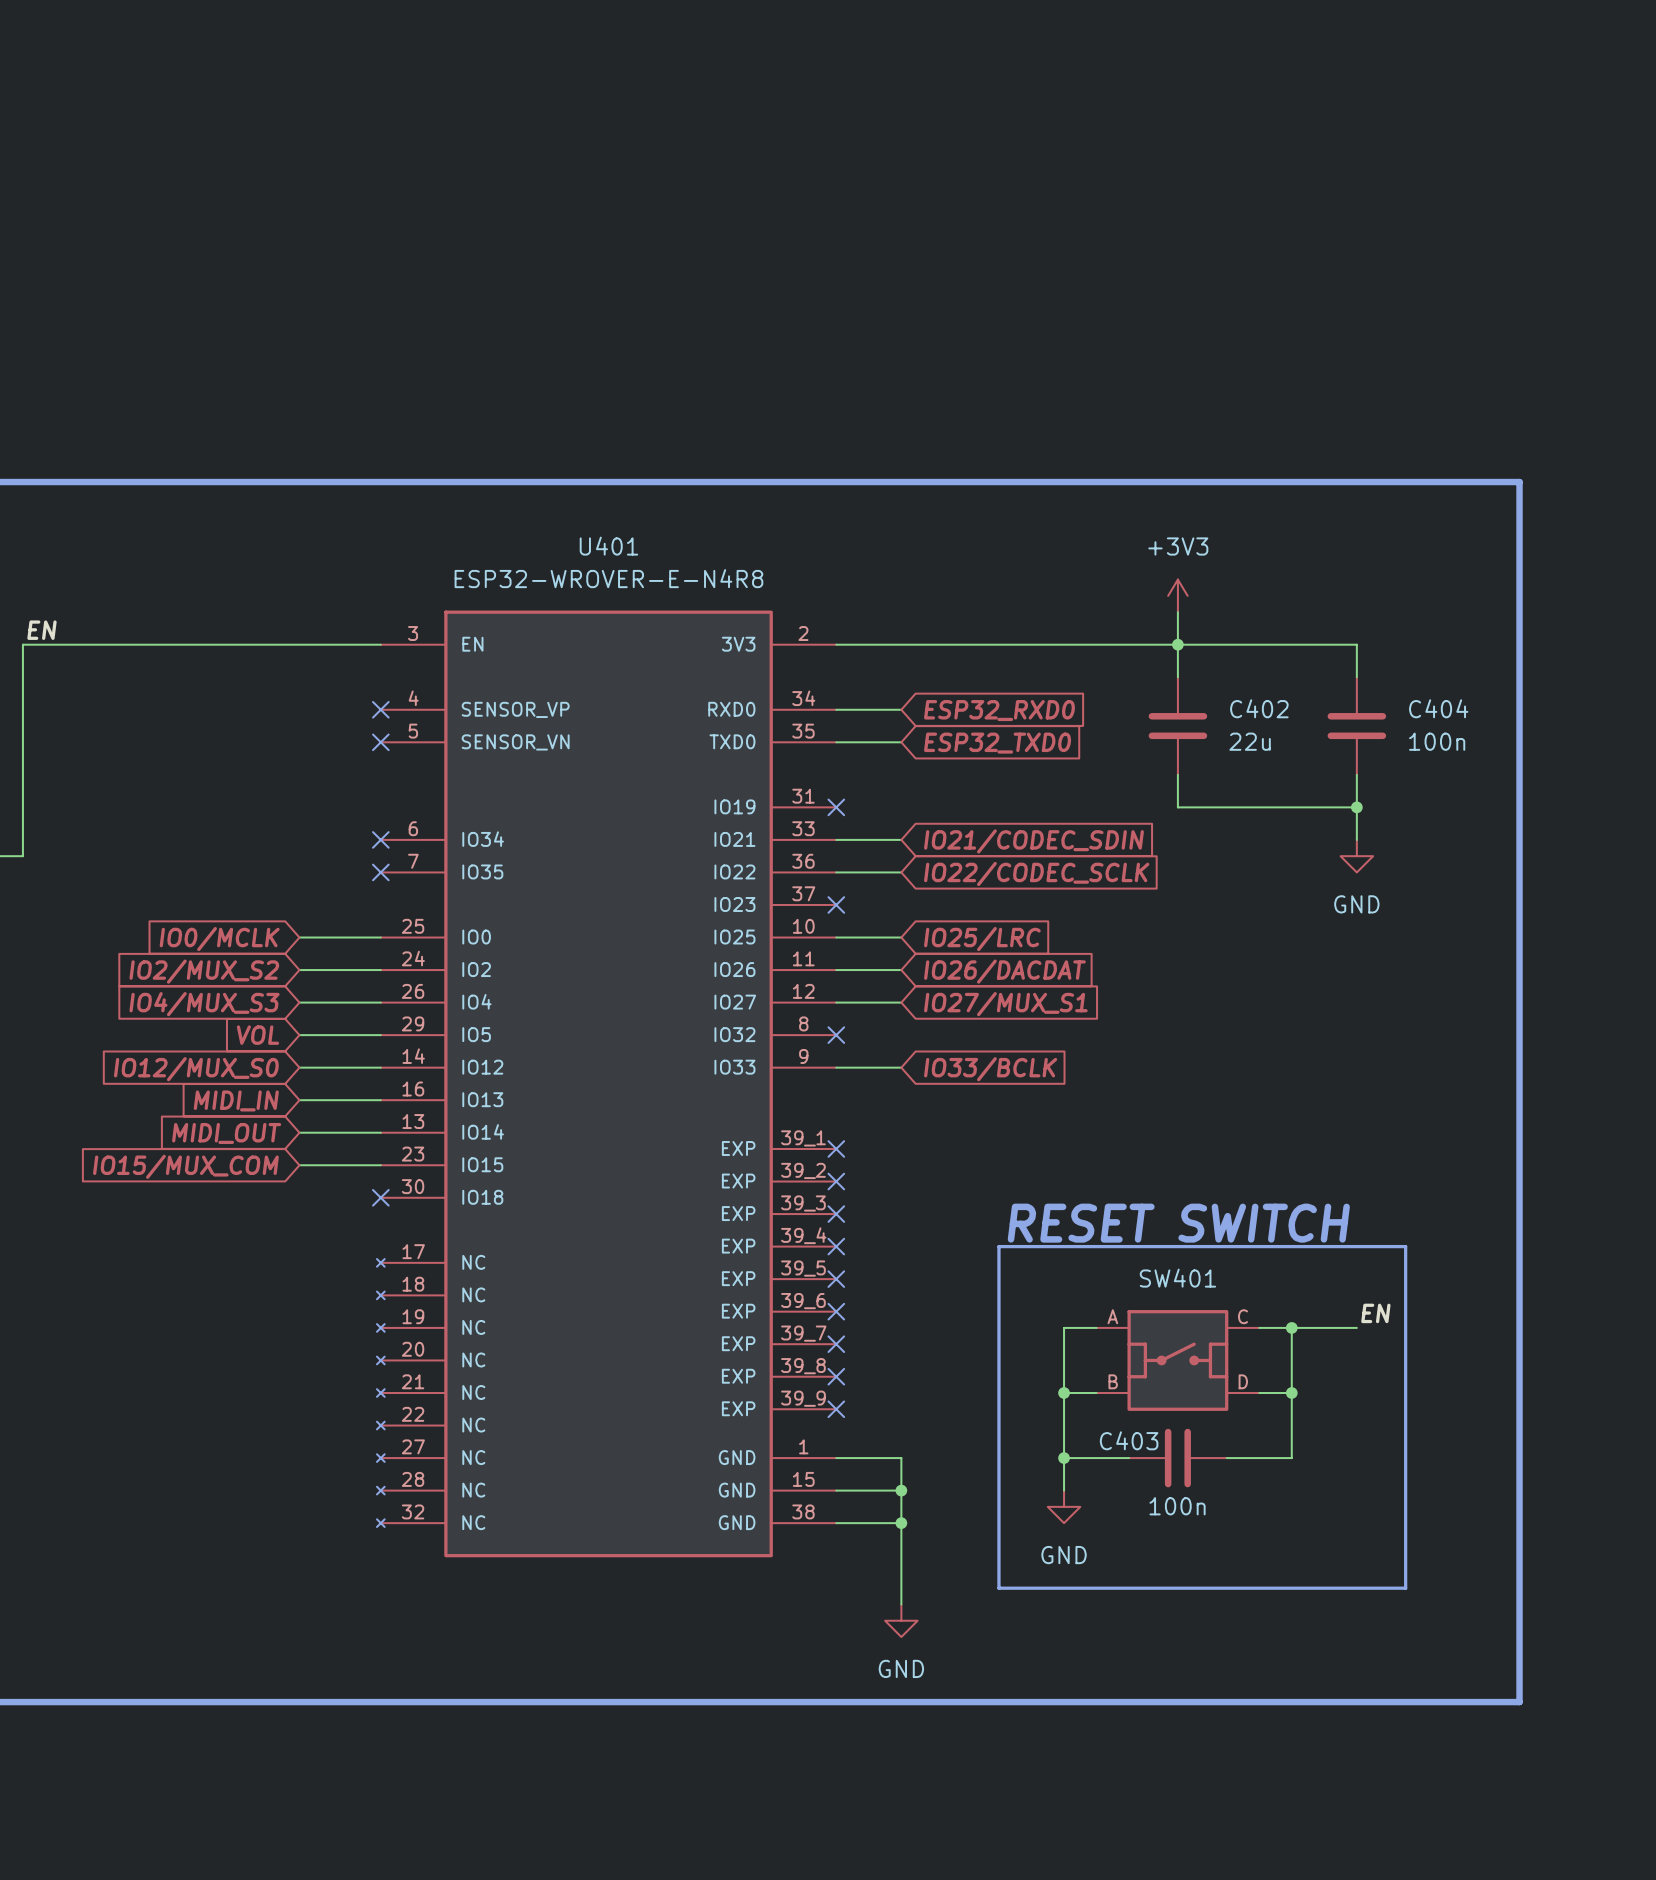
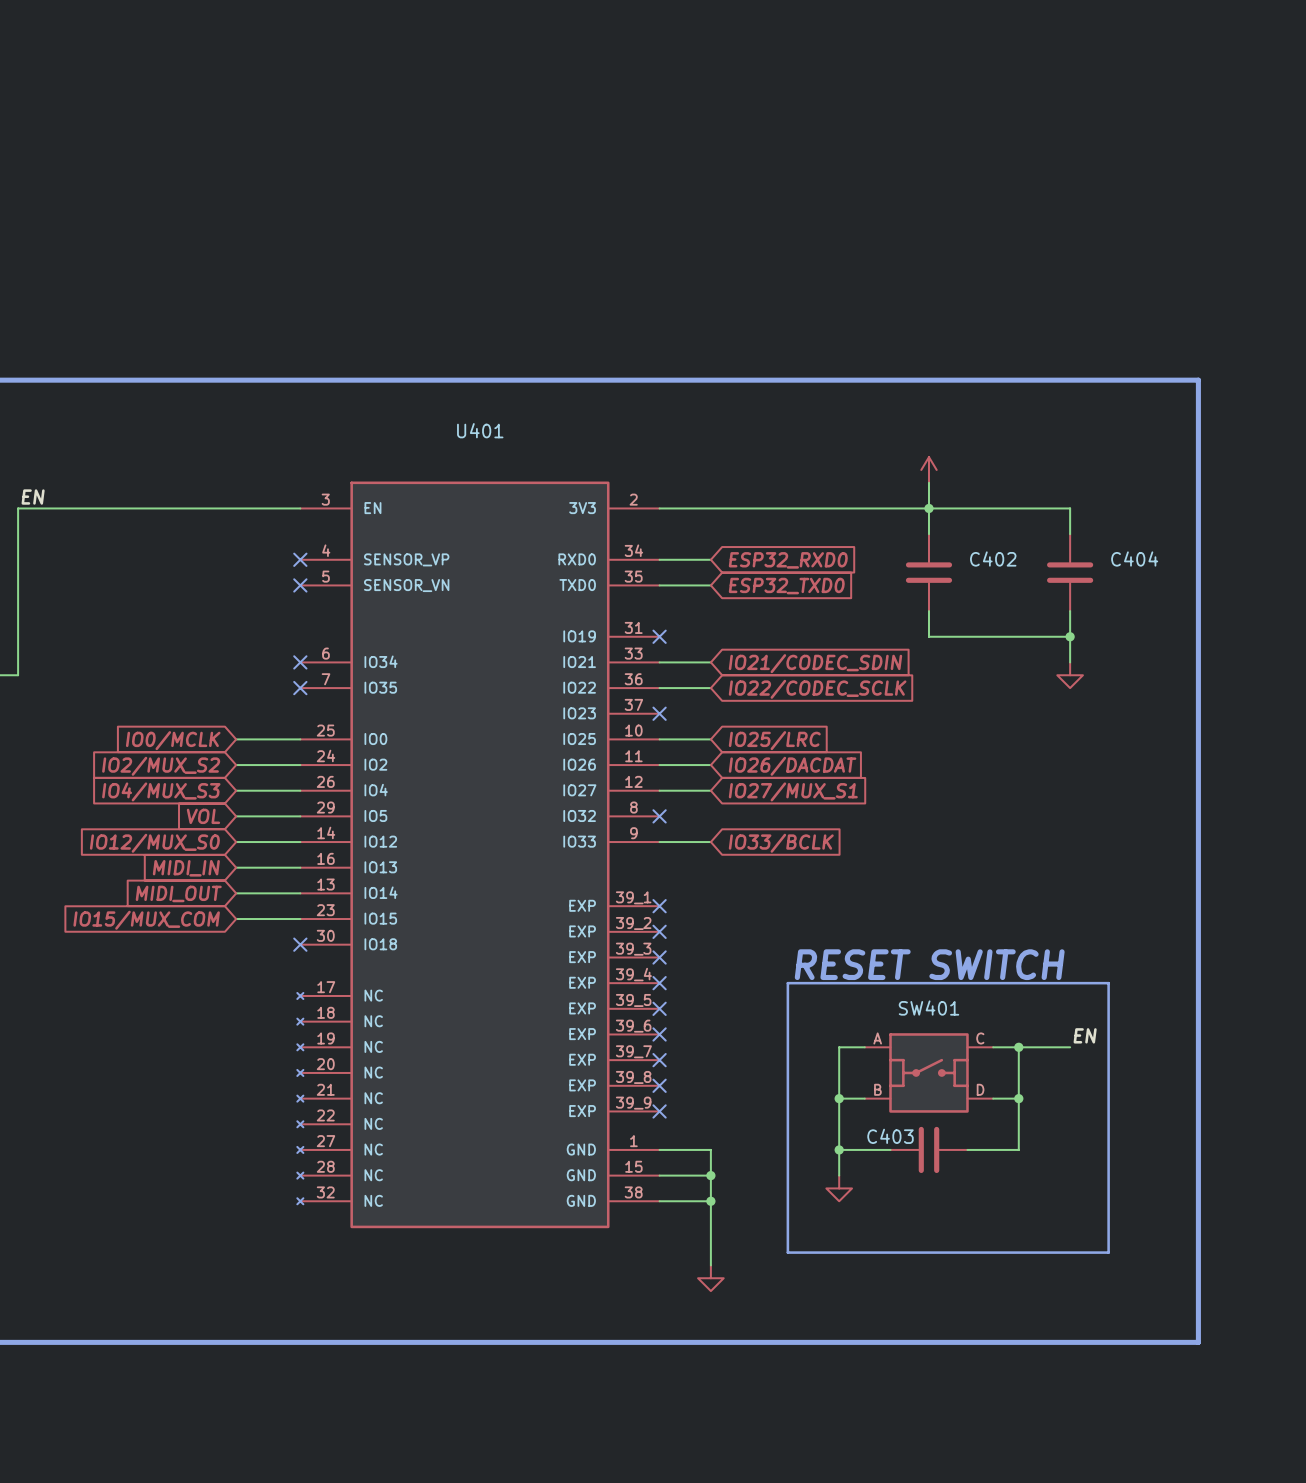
power symbol text: +3V3 (1178, 546) -> none
U401 value: ESP32-WROVER-E-N4R8 (608, 578) -> none
C402 value: 22u (1250, 741) -> none
C404 value: 100n (1437, 741) -> none
power symbol text: GND (1356, 904) -> none
C403 value: 100n (1177, 1506) -> none
power symbol text: GND (1064, 1555) -> none
power symbol text: GND (901, 1668) -> none

